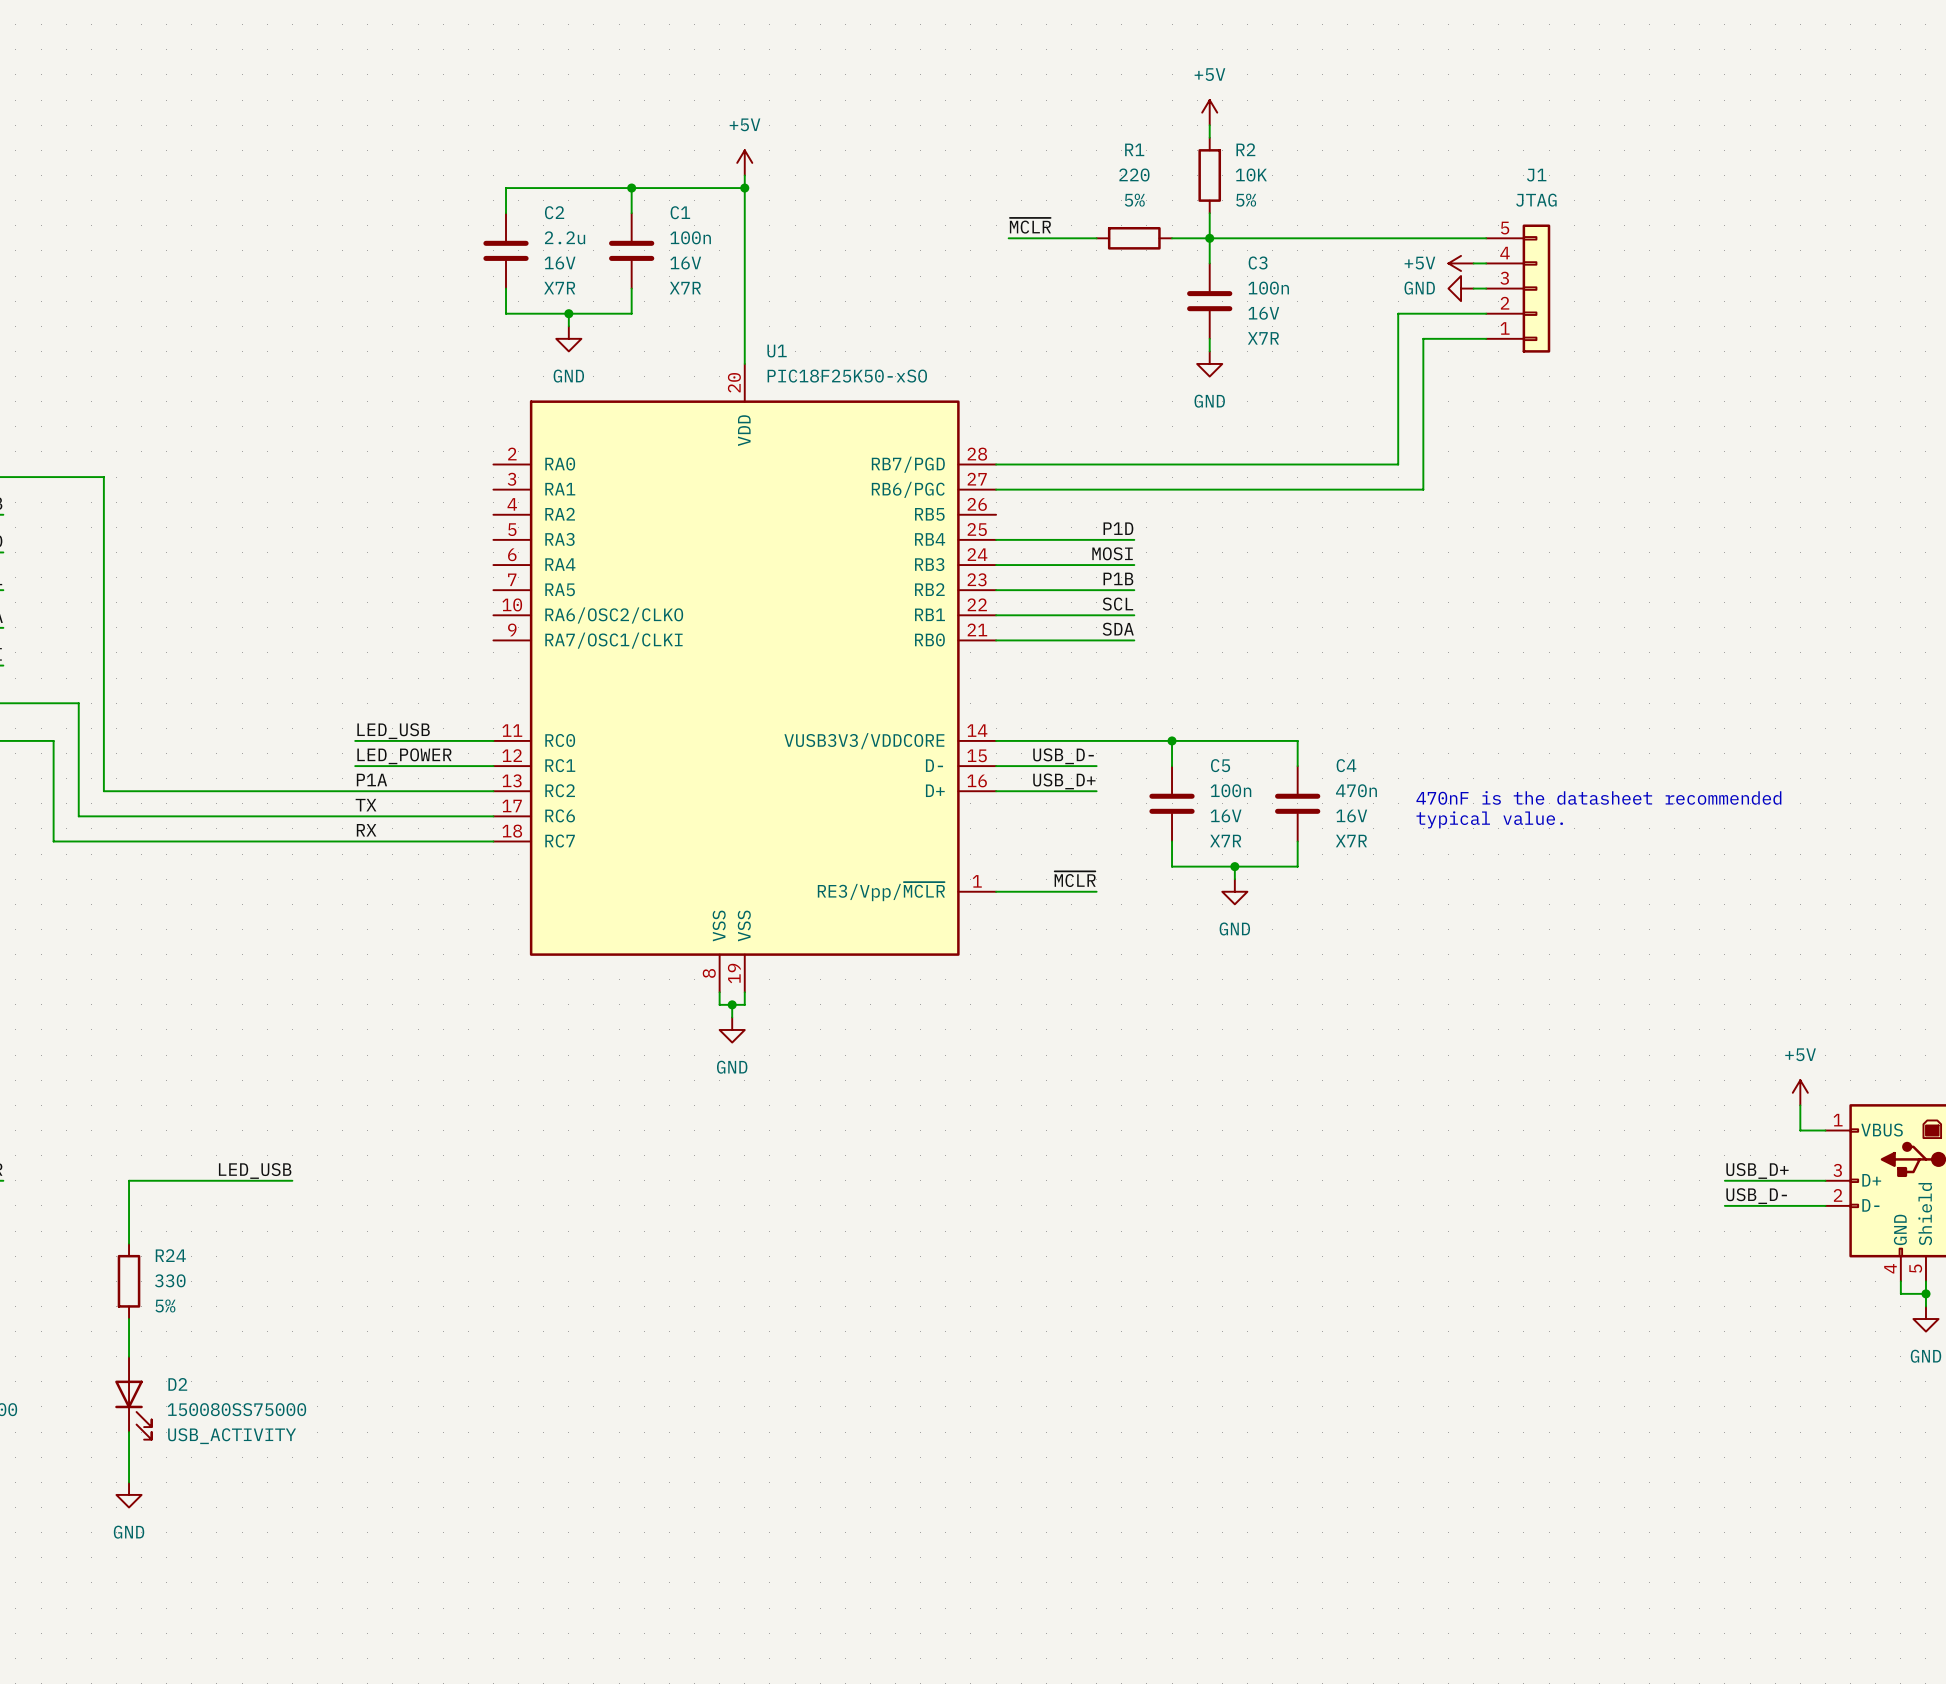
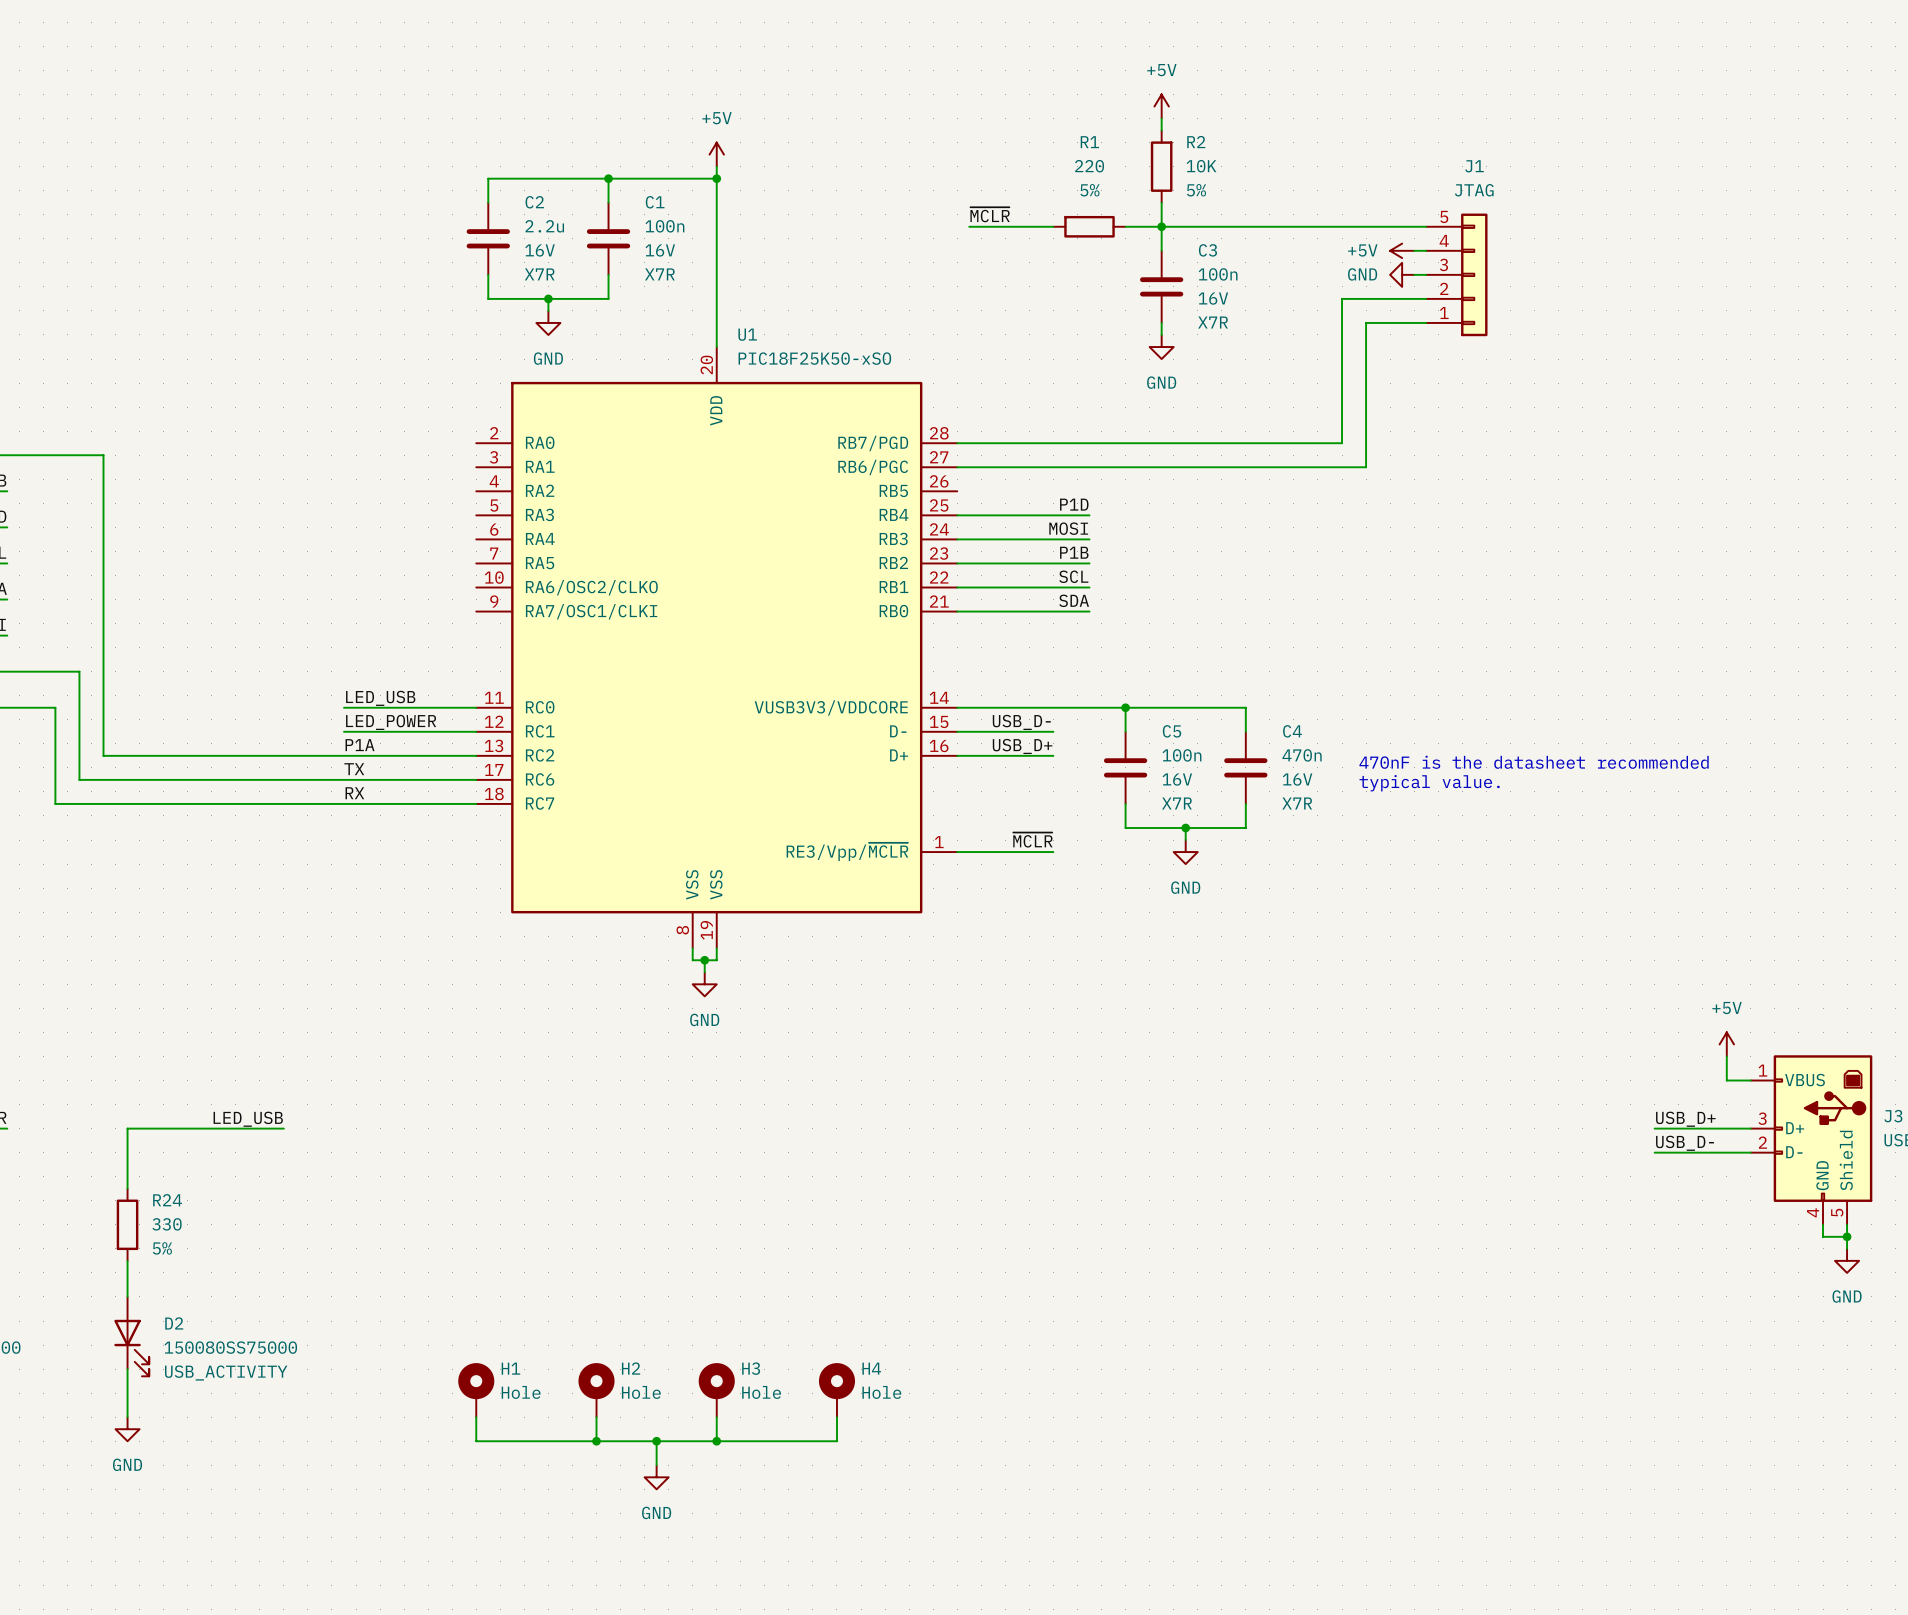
H1: none -> Hole (476, 1390)
H2: none -> Hole (596, 1390)
H3: none -> Hole (716, 1390)
H4: none -> Hole (836, 1390)
wire: none -> (476, 1417) (476, 1441) (836, 1441) (836, 1417)
wire: none -> (596, 1417) (596, 1441)
wire: none -> (716, 1417) (716, 1441)
junction: none -> (596, 1441)
wire: none -> (656, 1441) (656, 1465)
junction: none -> (656, 1441)
junction: none -> (716, 1441)
power symbol: none -> GND (656, 1477)

